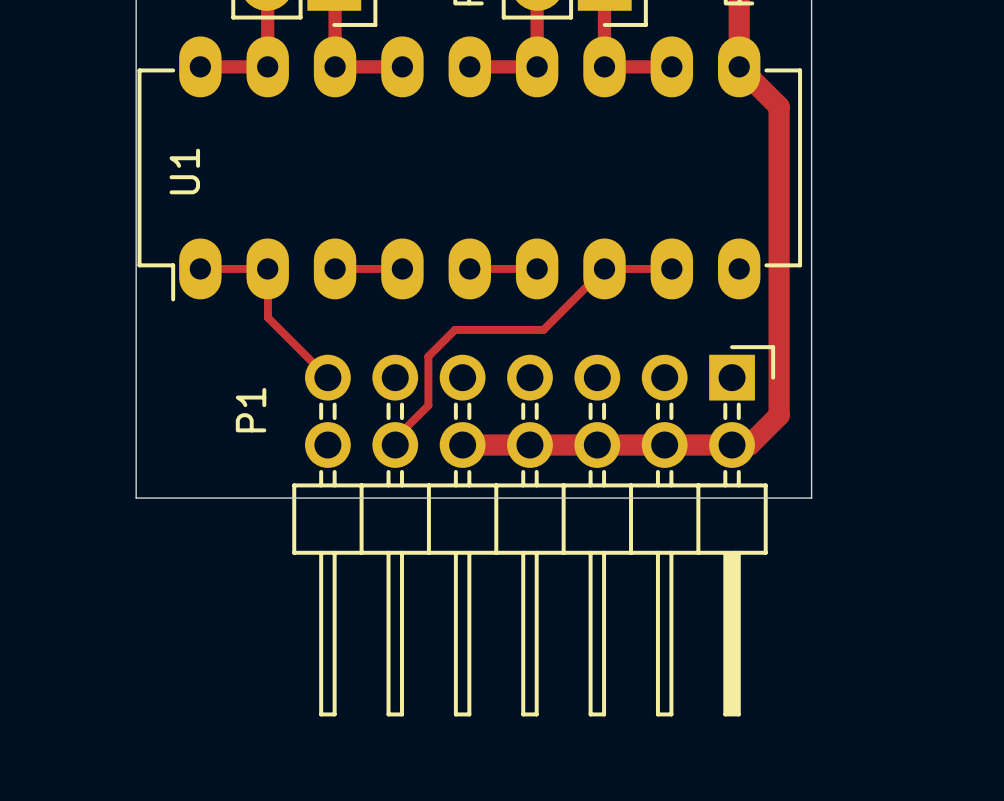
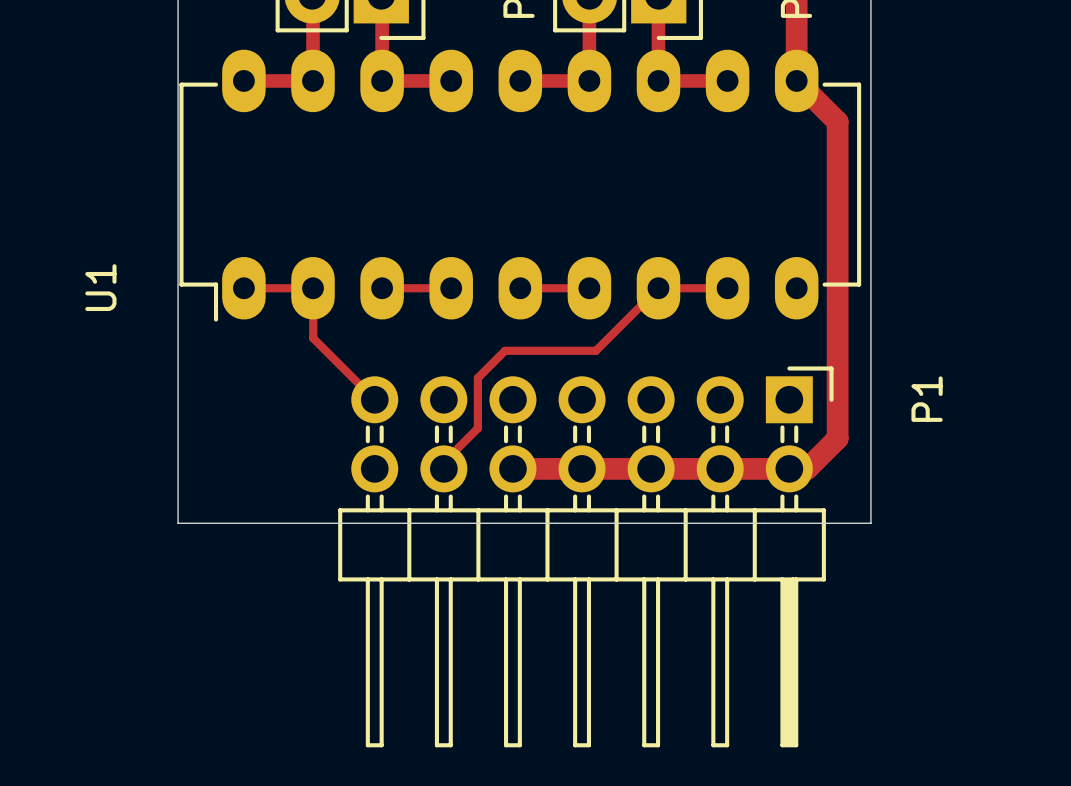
U1 name position: U1 (184, 171) -> U1 (100, 287)
P1 name position: P1 (251, 410) -> P1 (927, 399)

